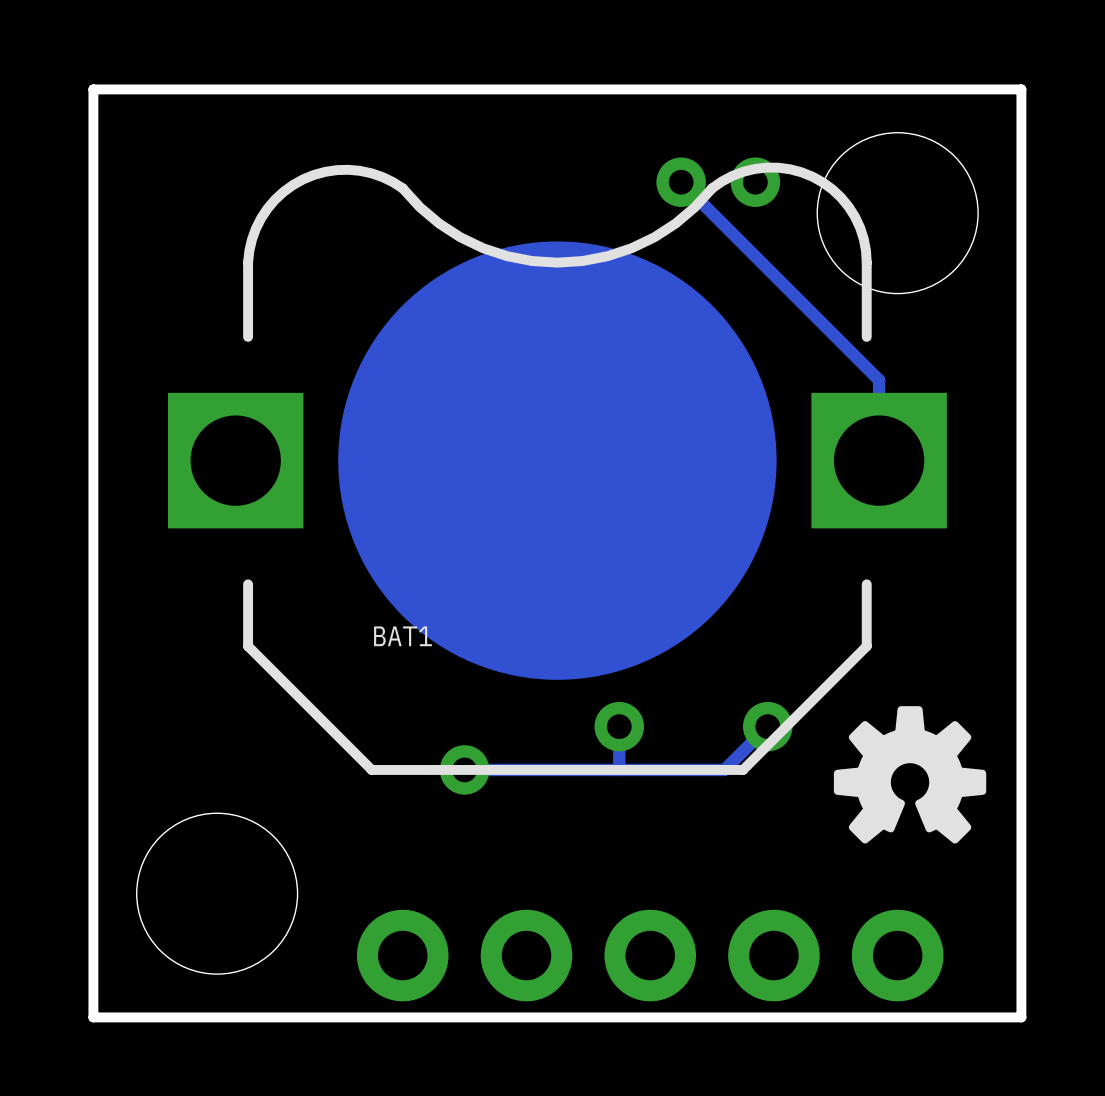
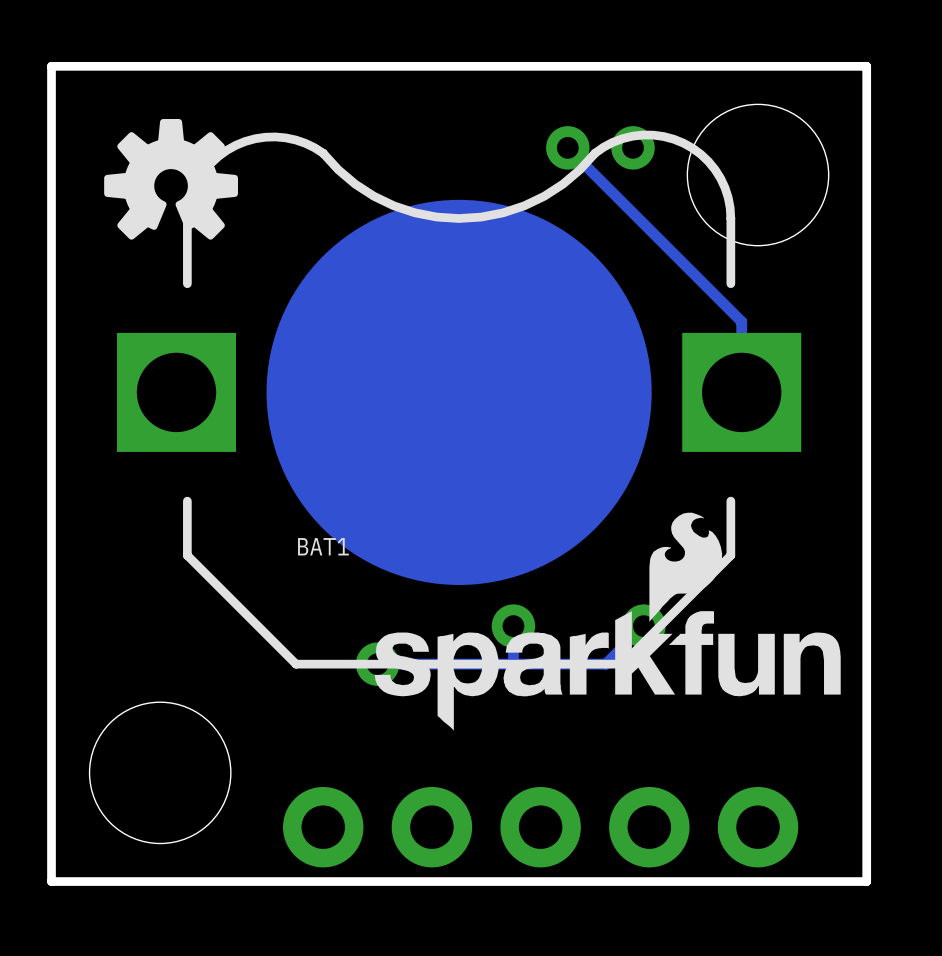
drawing: none -> [374, 512, 841, 731]
drawing position: (910, 774) -> (171, 179)

